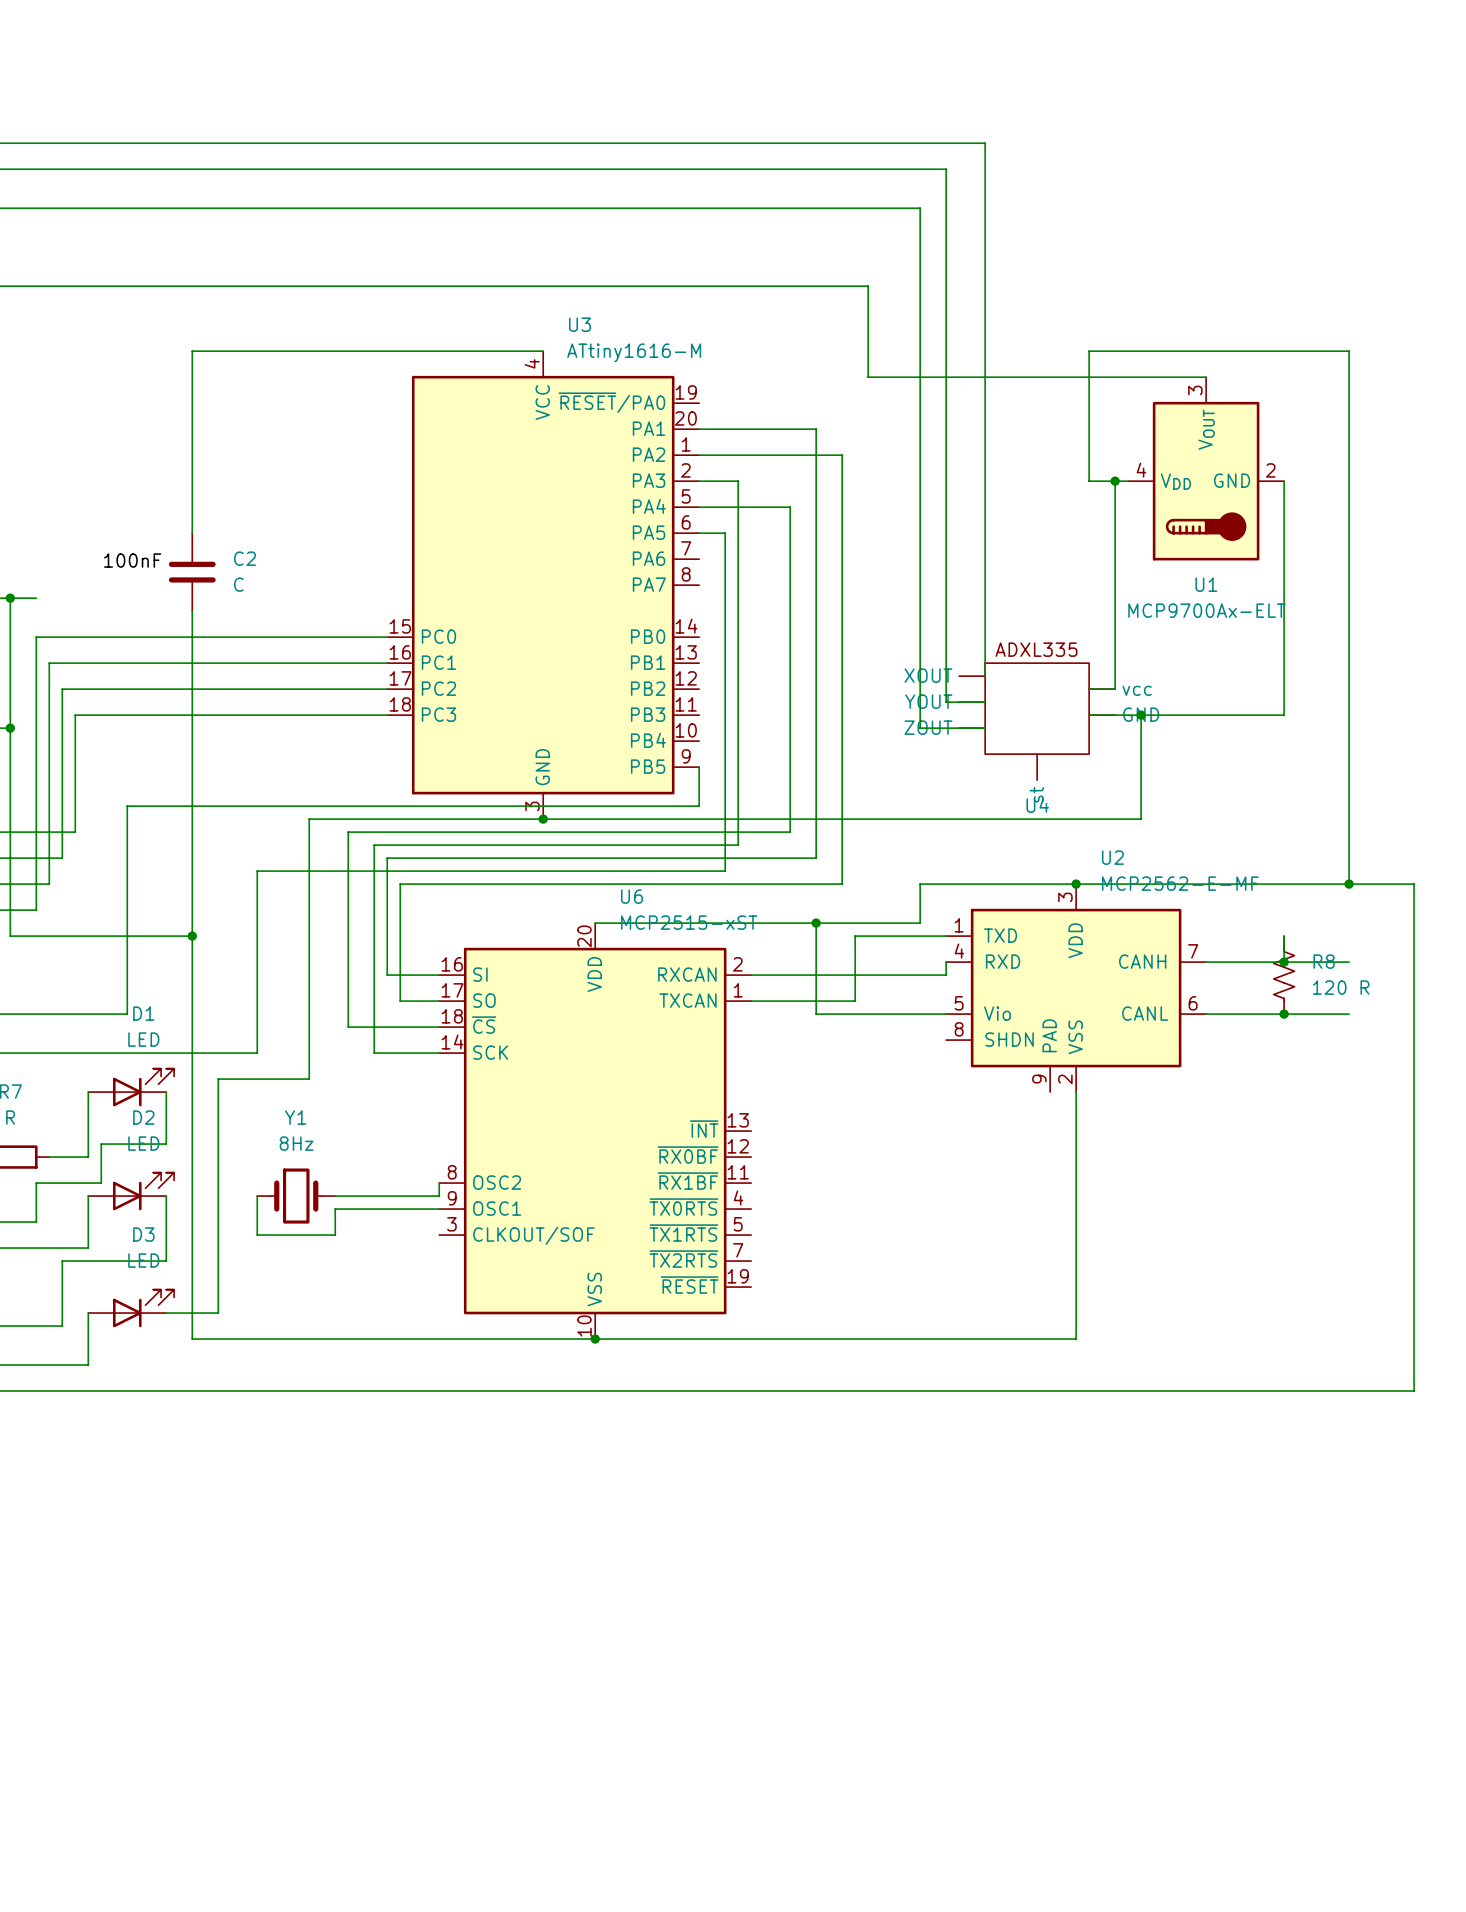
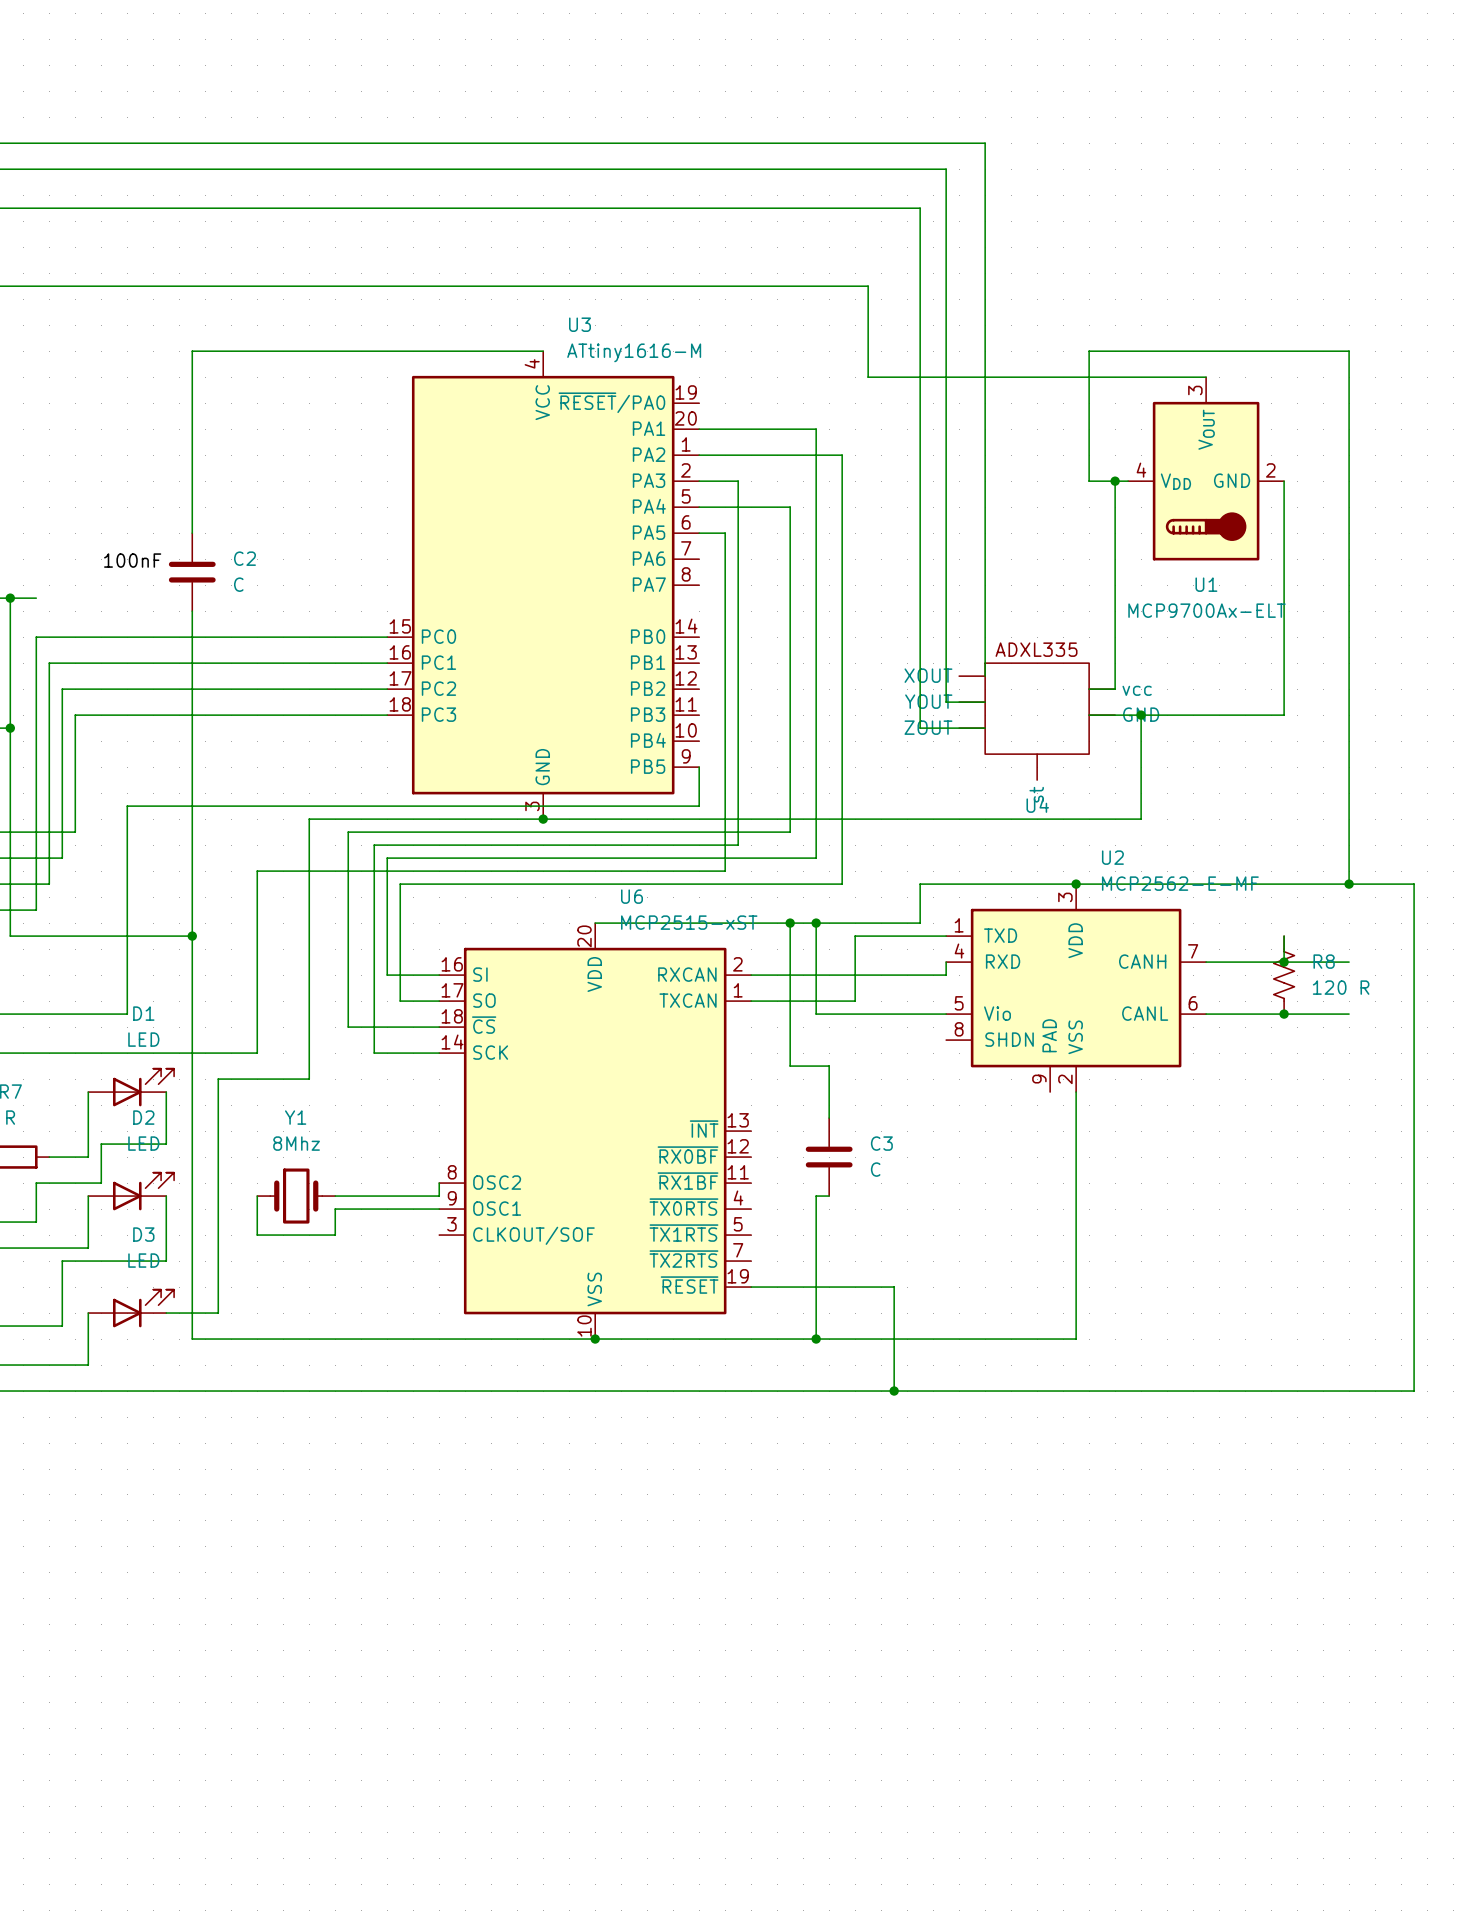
wire: none -> (790, 923) (790, 1066) (829, 1066) (829, 1118)
junction: none -> (790, 923)
Y1 value: 8Hz (296, 1143) -> 8Mhz (296, 1143)
C3: none -> C (829, 1157)
wire: none -> (829, 1196) (816, 1196) (816, 1339)
wire: none -> (751, 1287) (894, 1287) (894, 1391)
junction: none -> (816, 1339)
junction: none -> (894, 1391)

